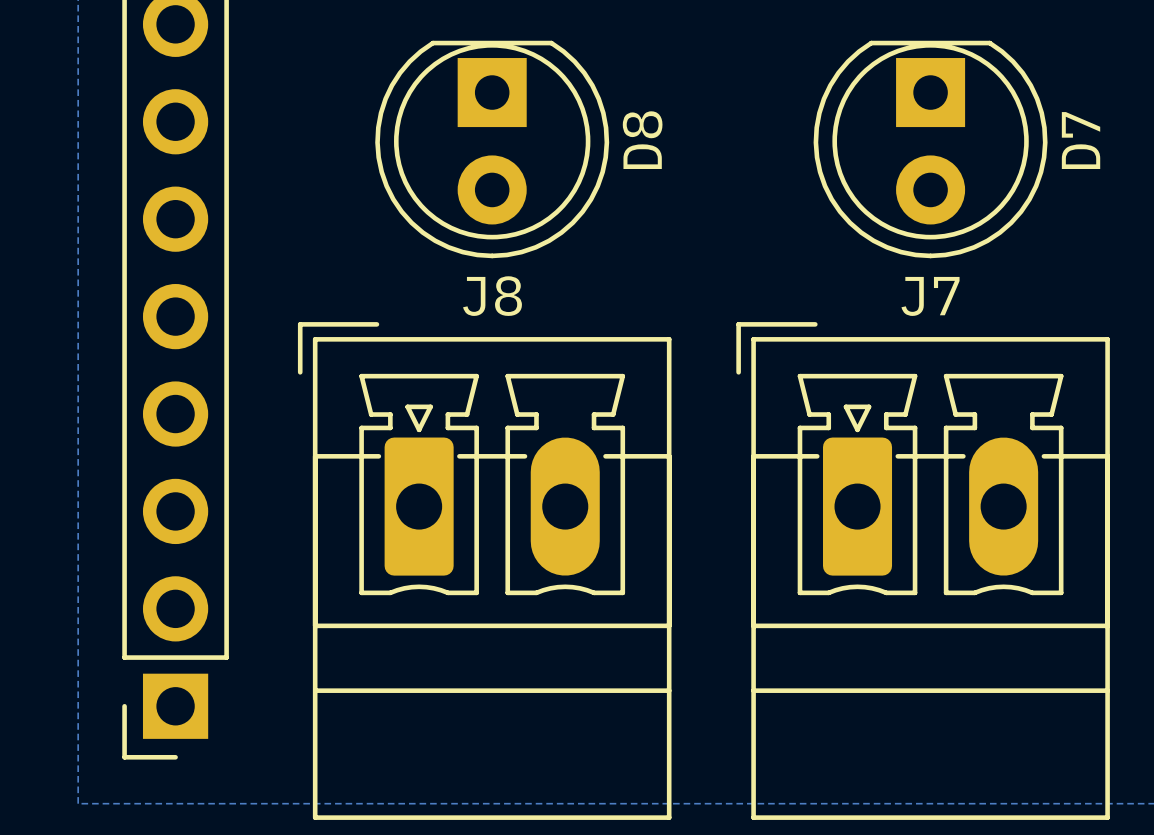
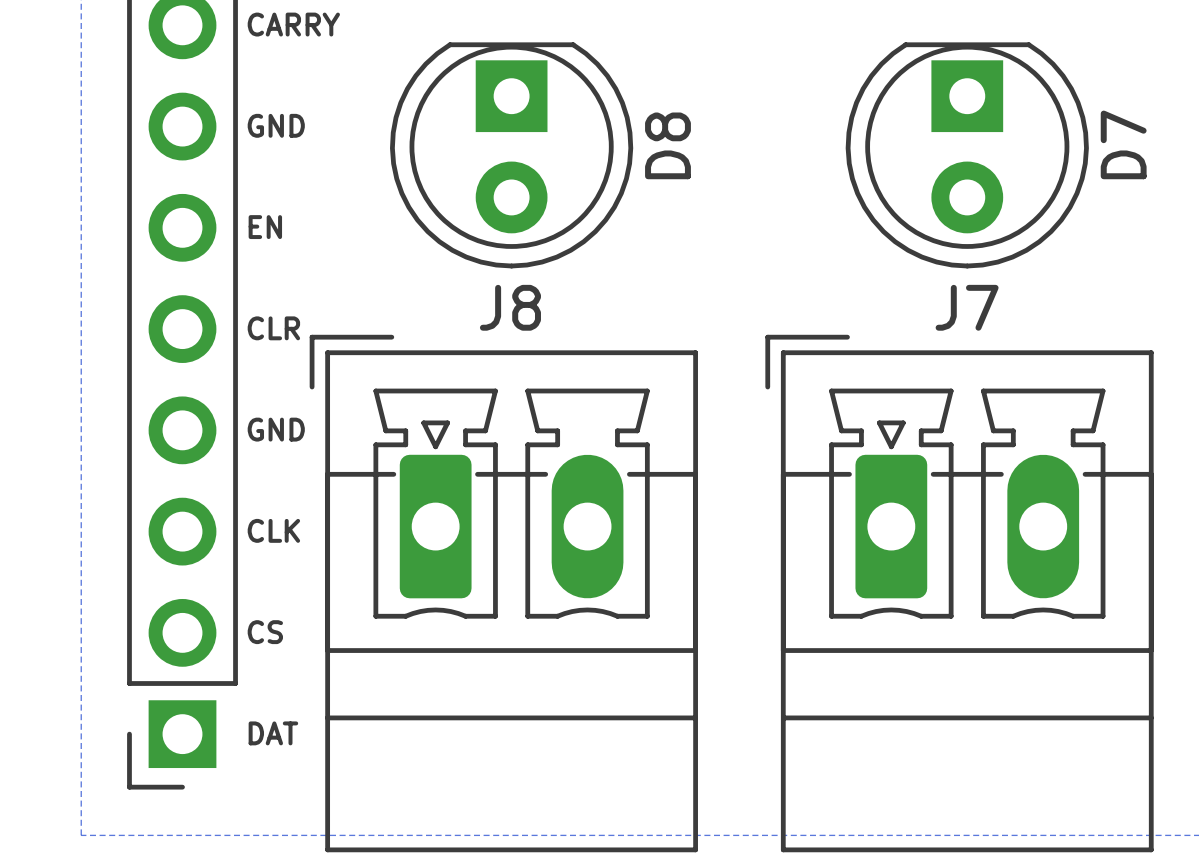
text: none -> CARRY (293, 24)
text: none -> GND (276, 125)
text: none -> EN (265, 227)
text: none -> CLR (273, 328)
text: none -> GND (276, 429)
text: none -> CLK (273, 530)
text: none -> CS (265, 632)
text: none -> DAT (273, 733)

